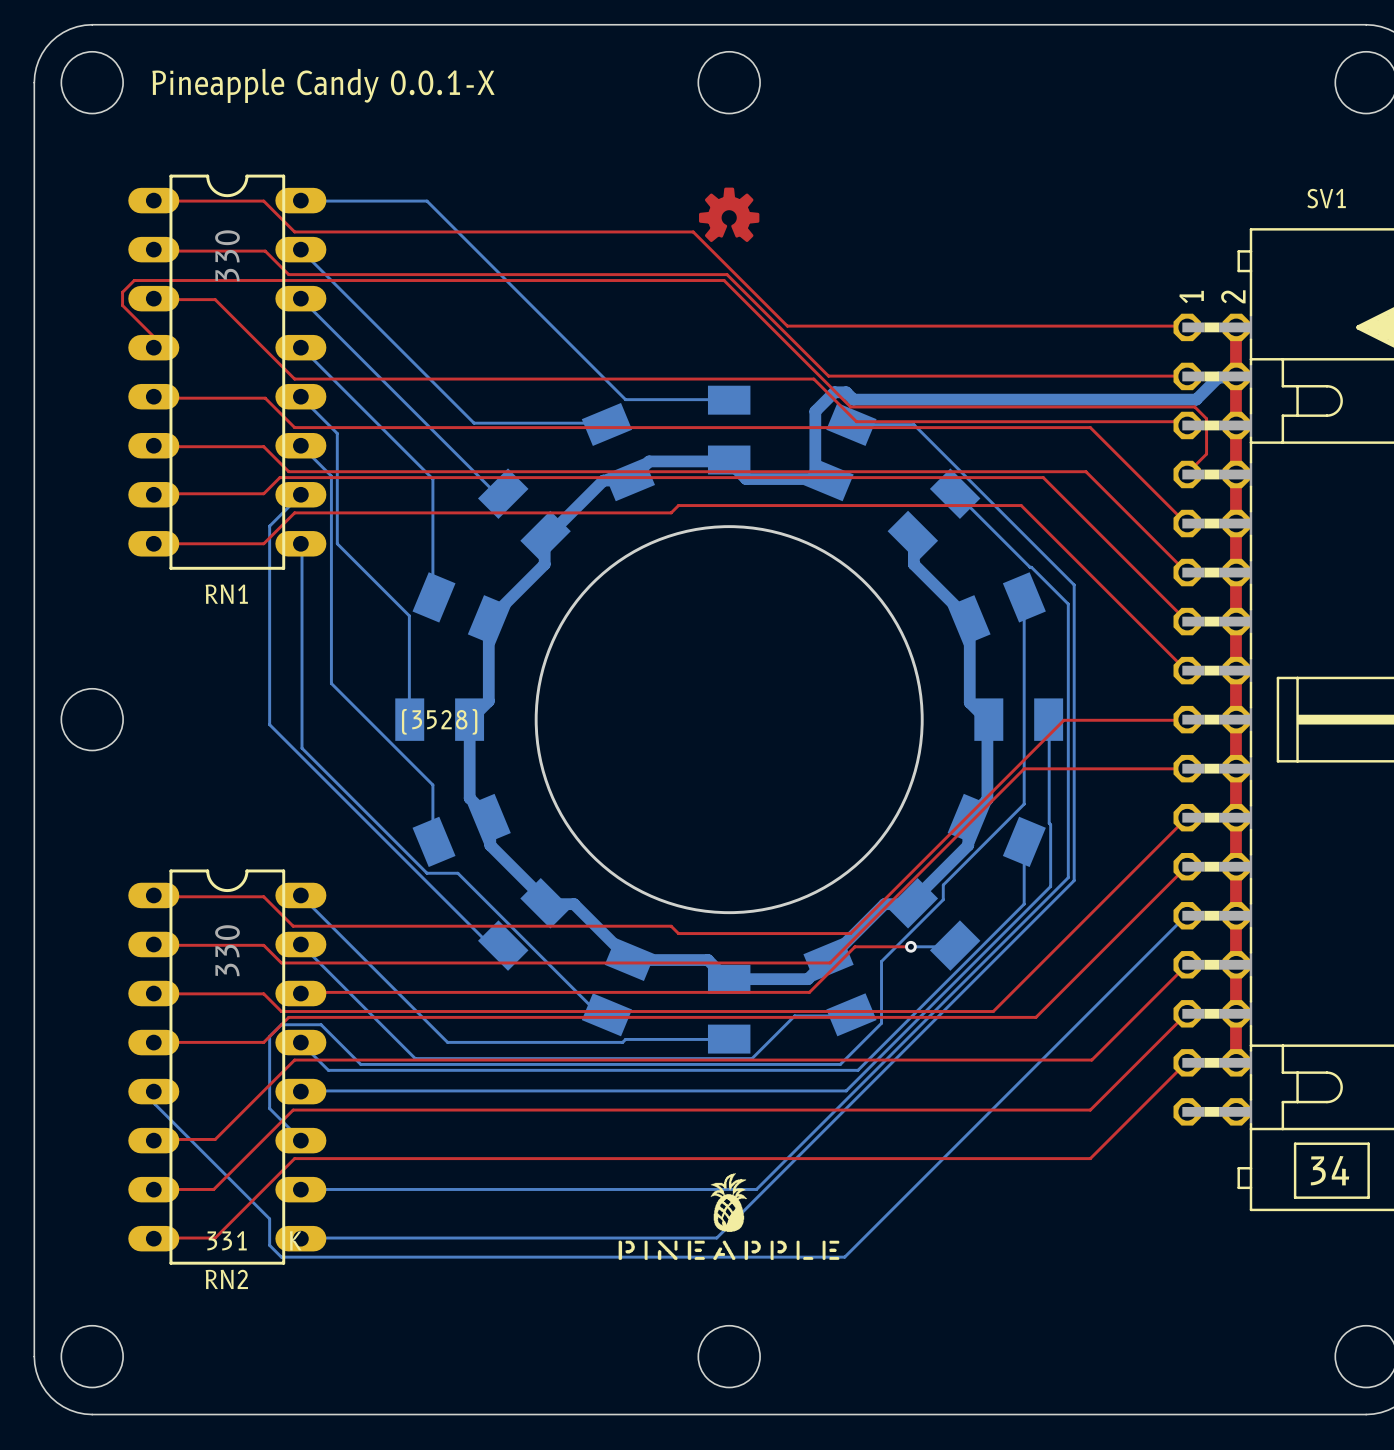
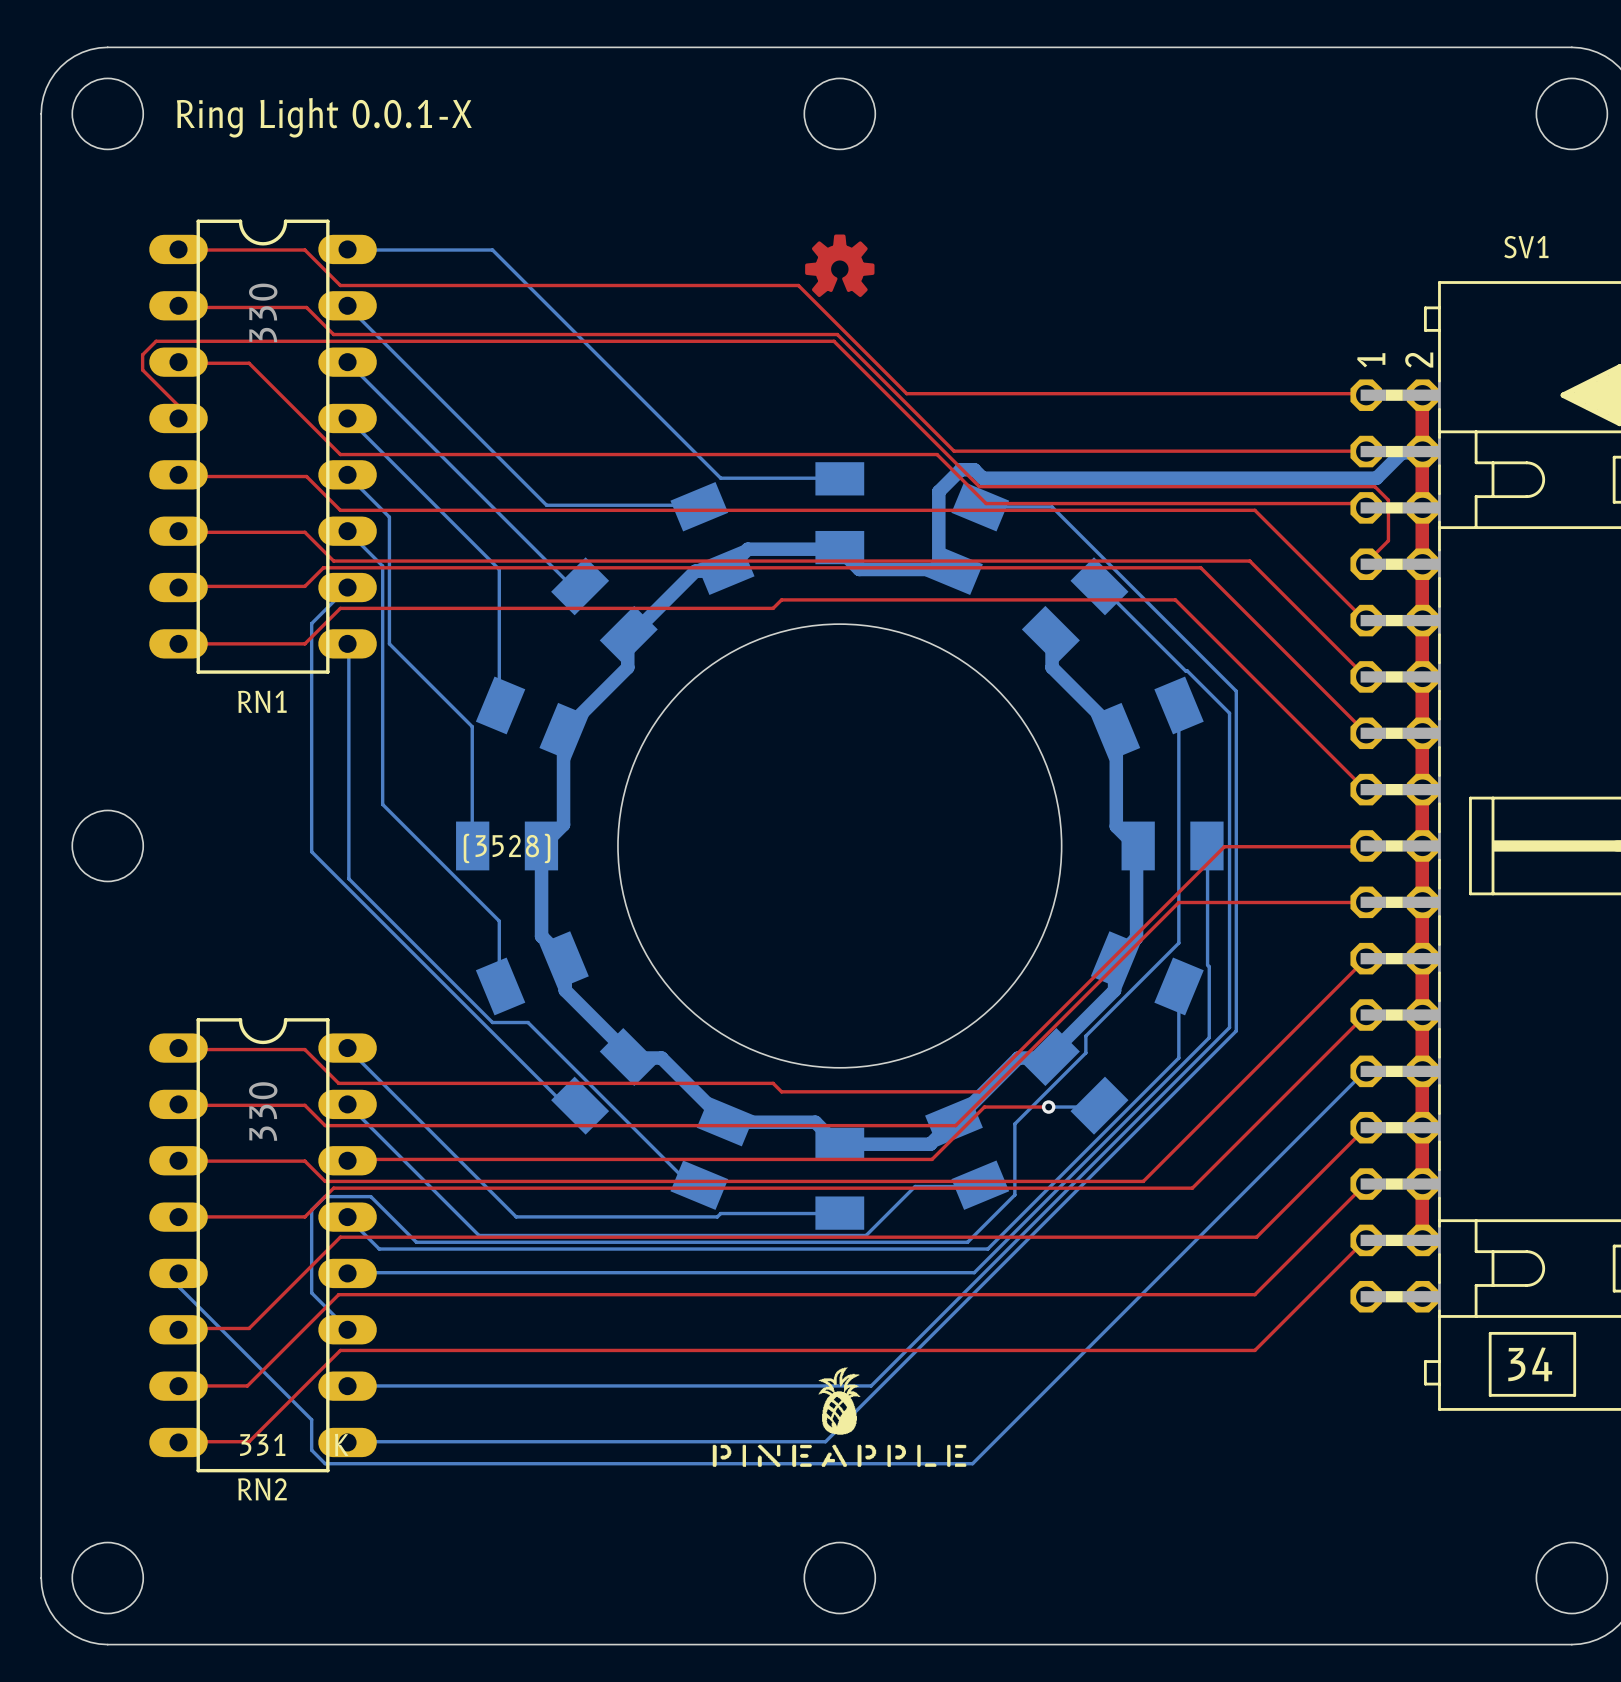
text: Pineapple Candy 0.0.1-X (323, 85) -> Ring Light 0.0.1-X (324, 117)
round board edge: [534, 525, 924, 915] -> none

